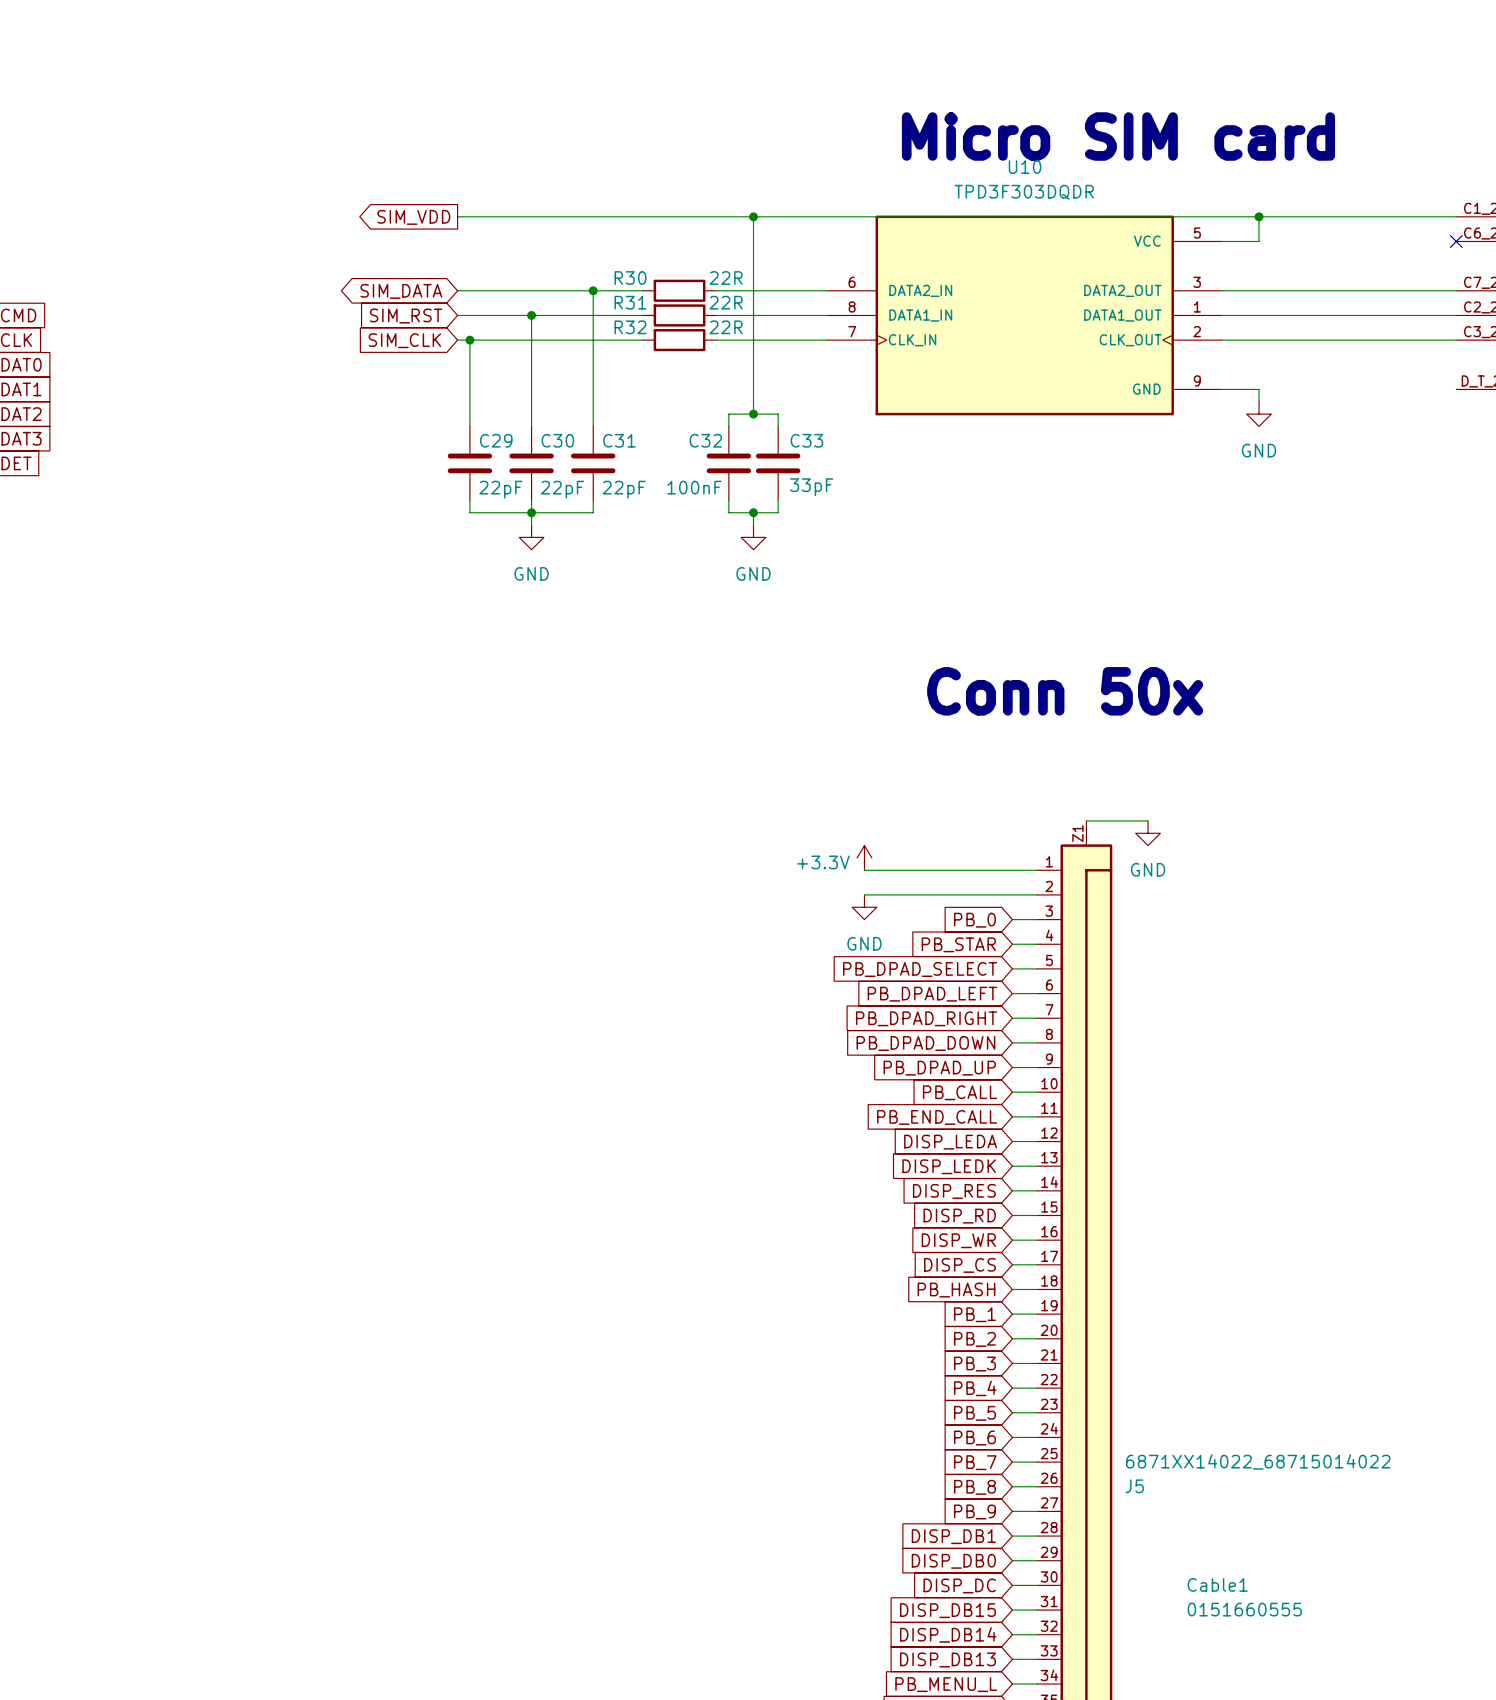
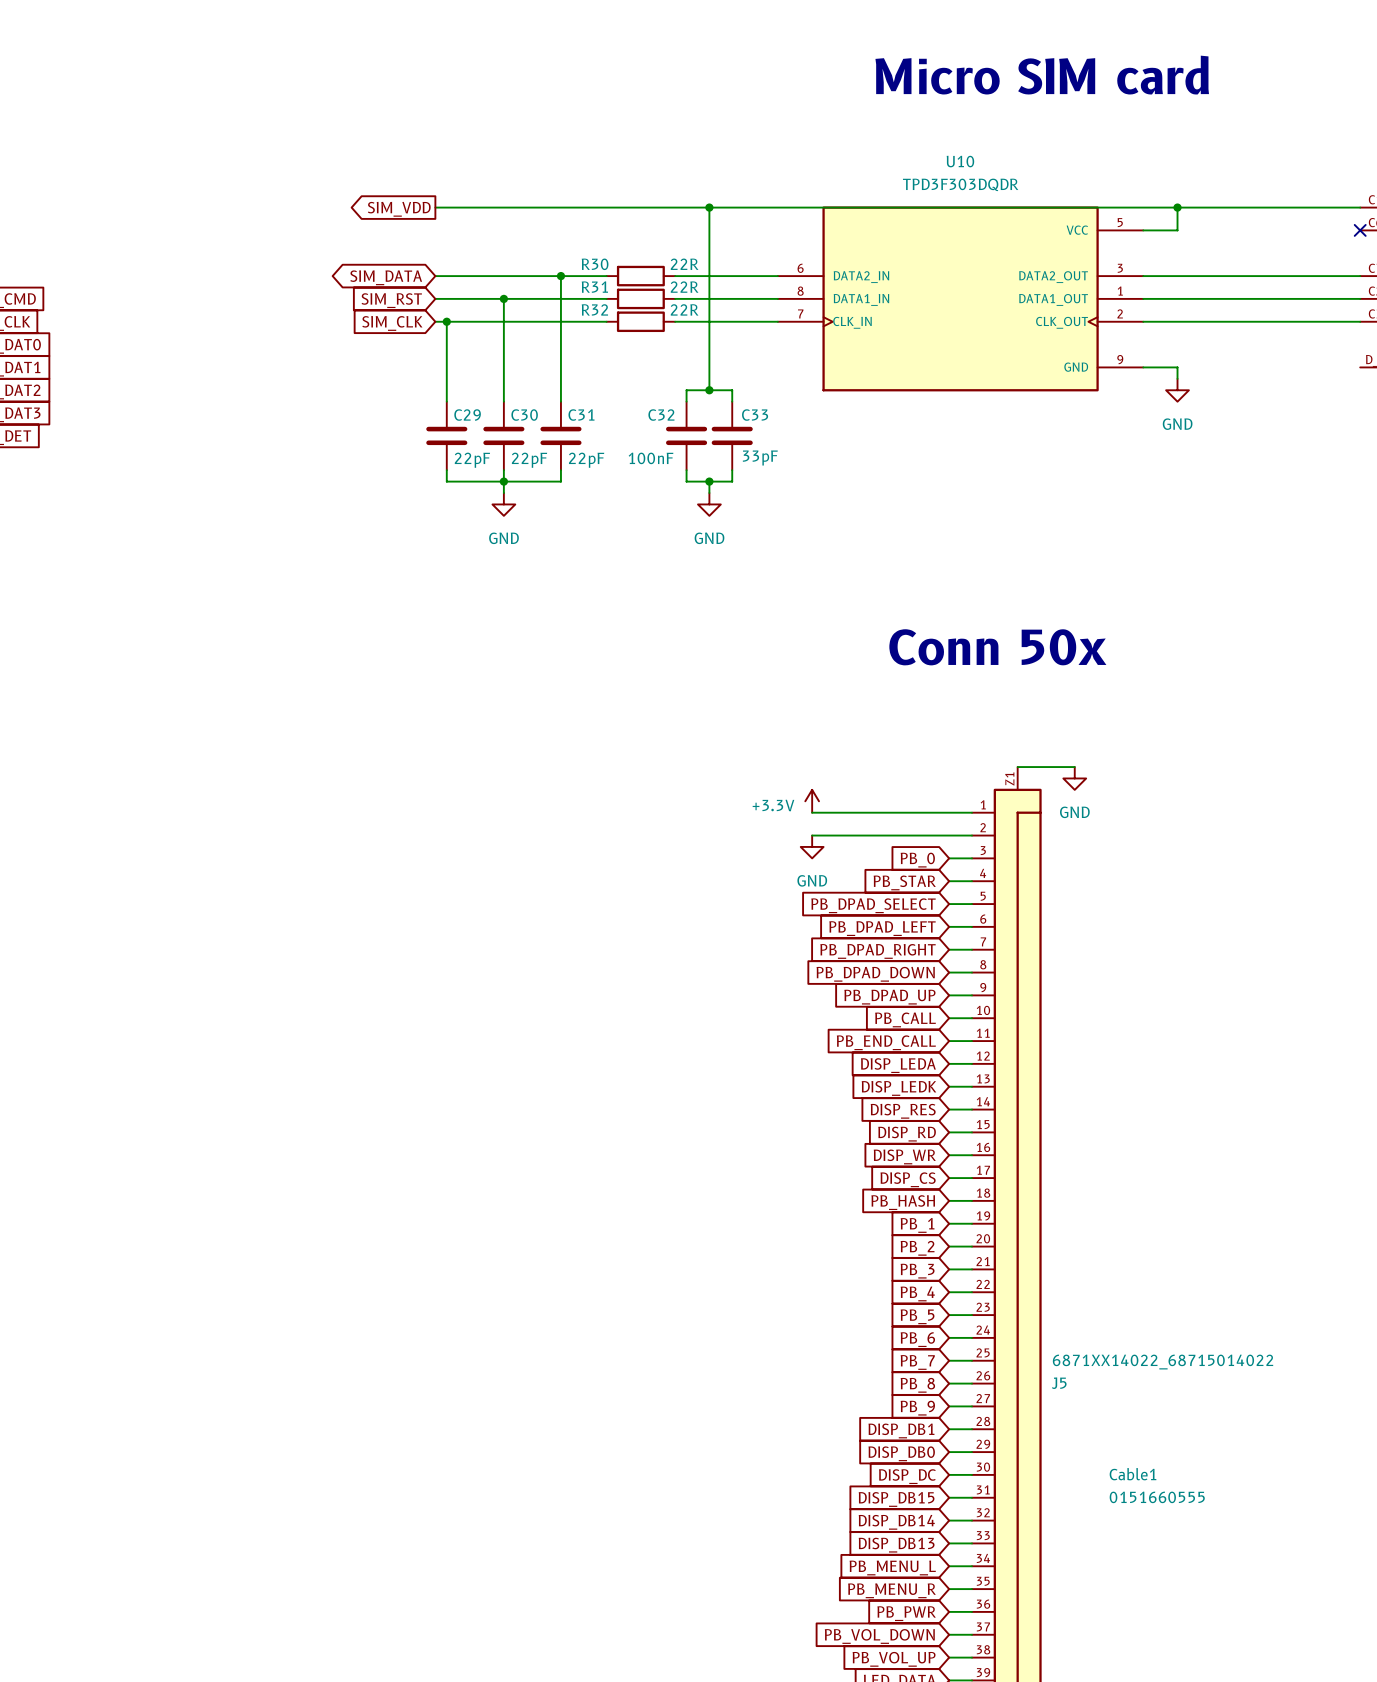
text position: Micro SIM card (1118, 136) -> Micro SIM card (1042, 75)

